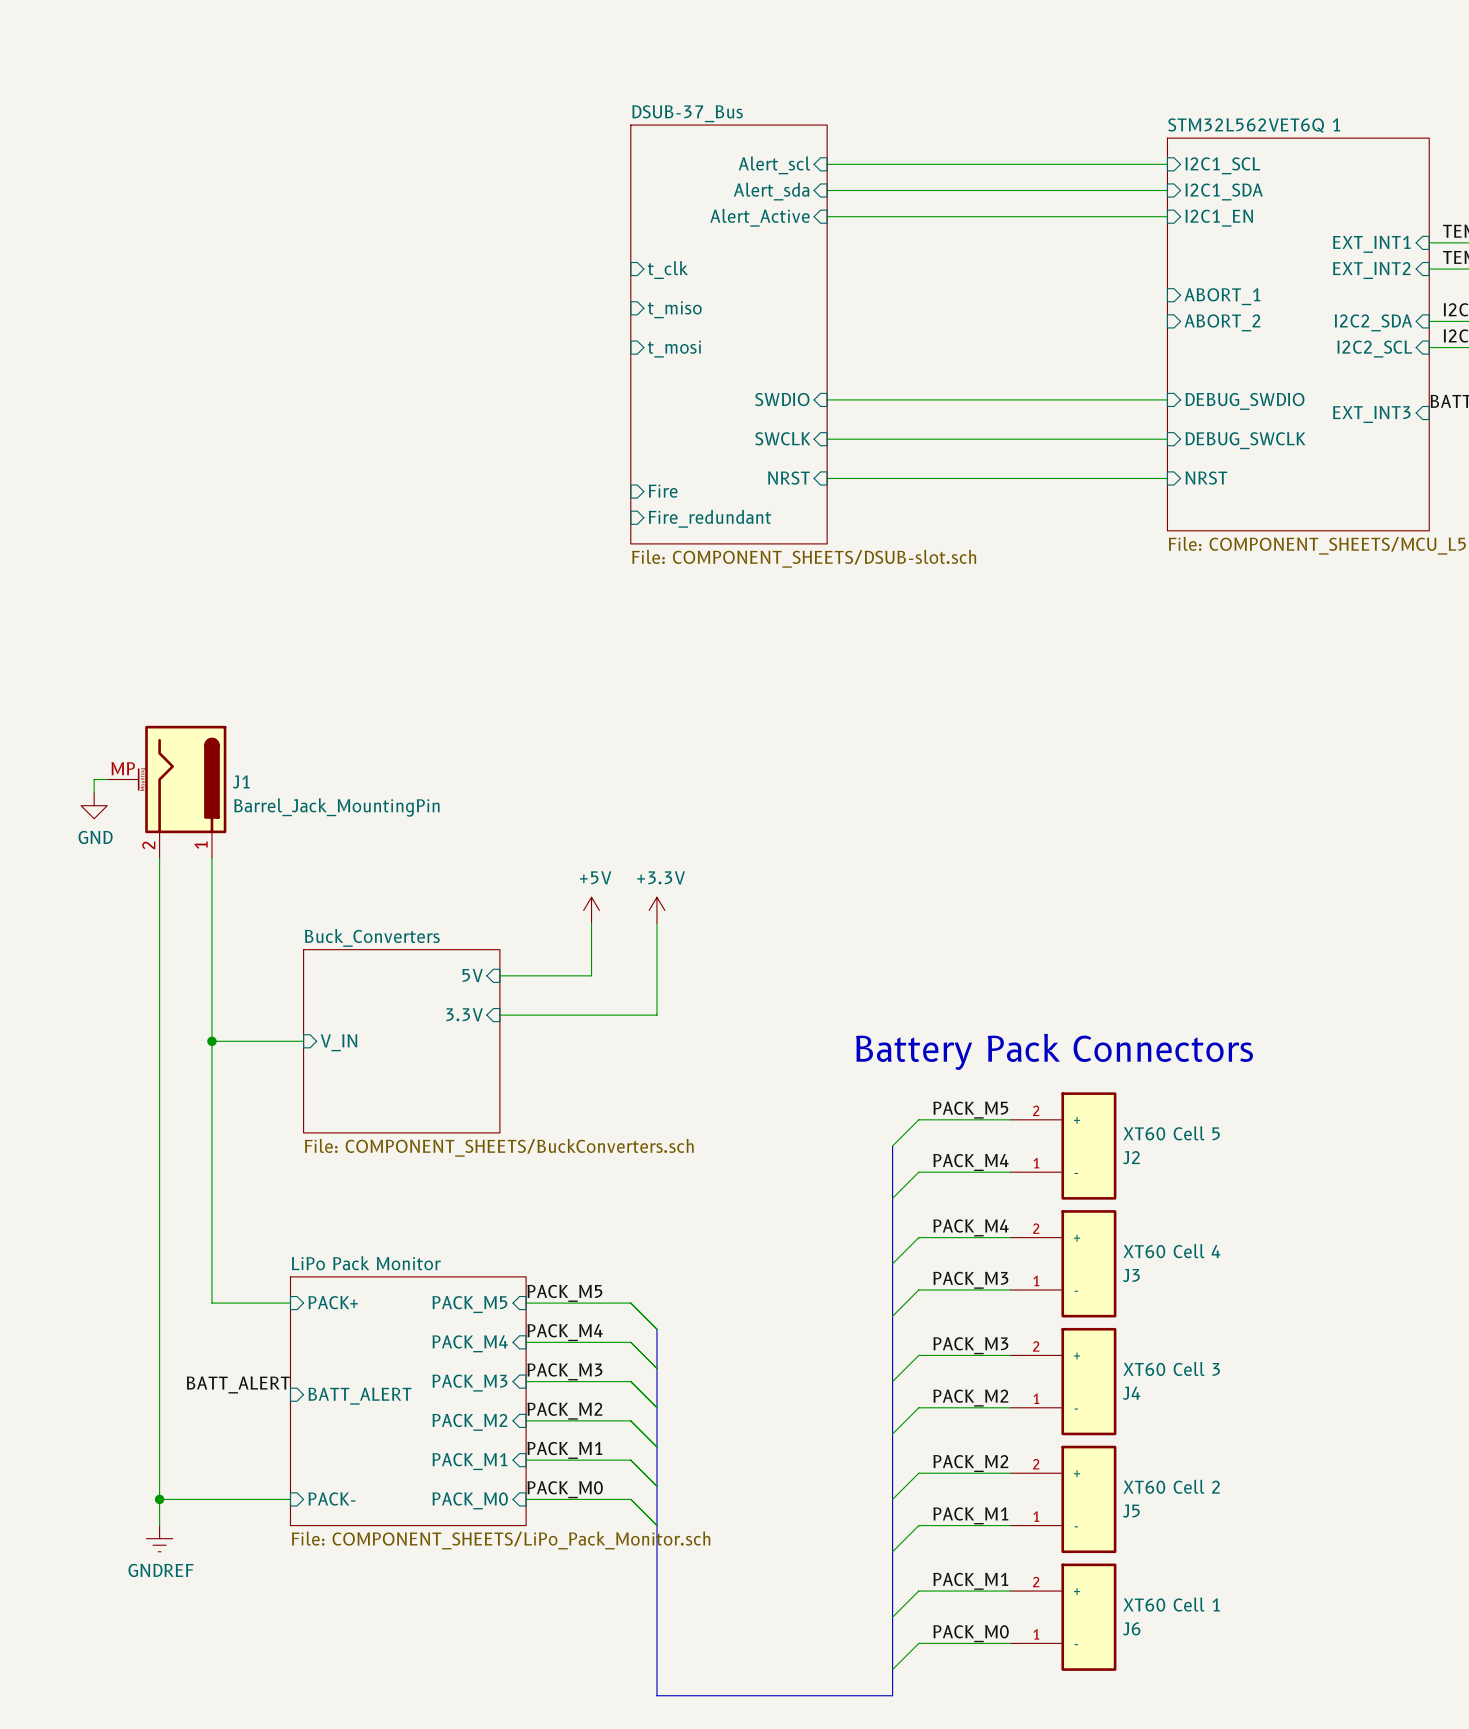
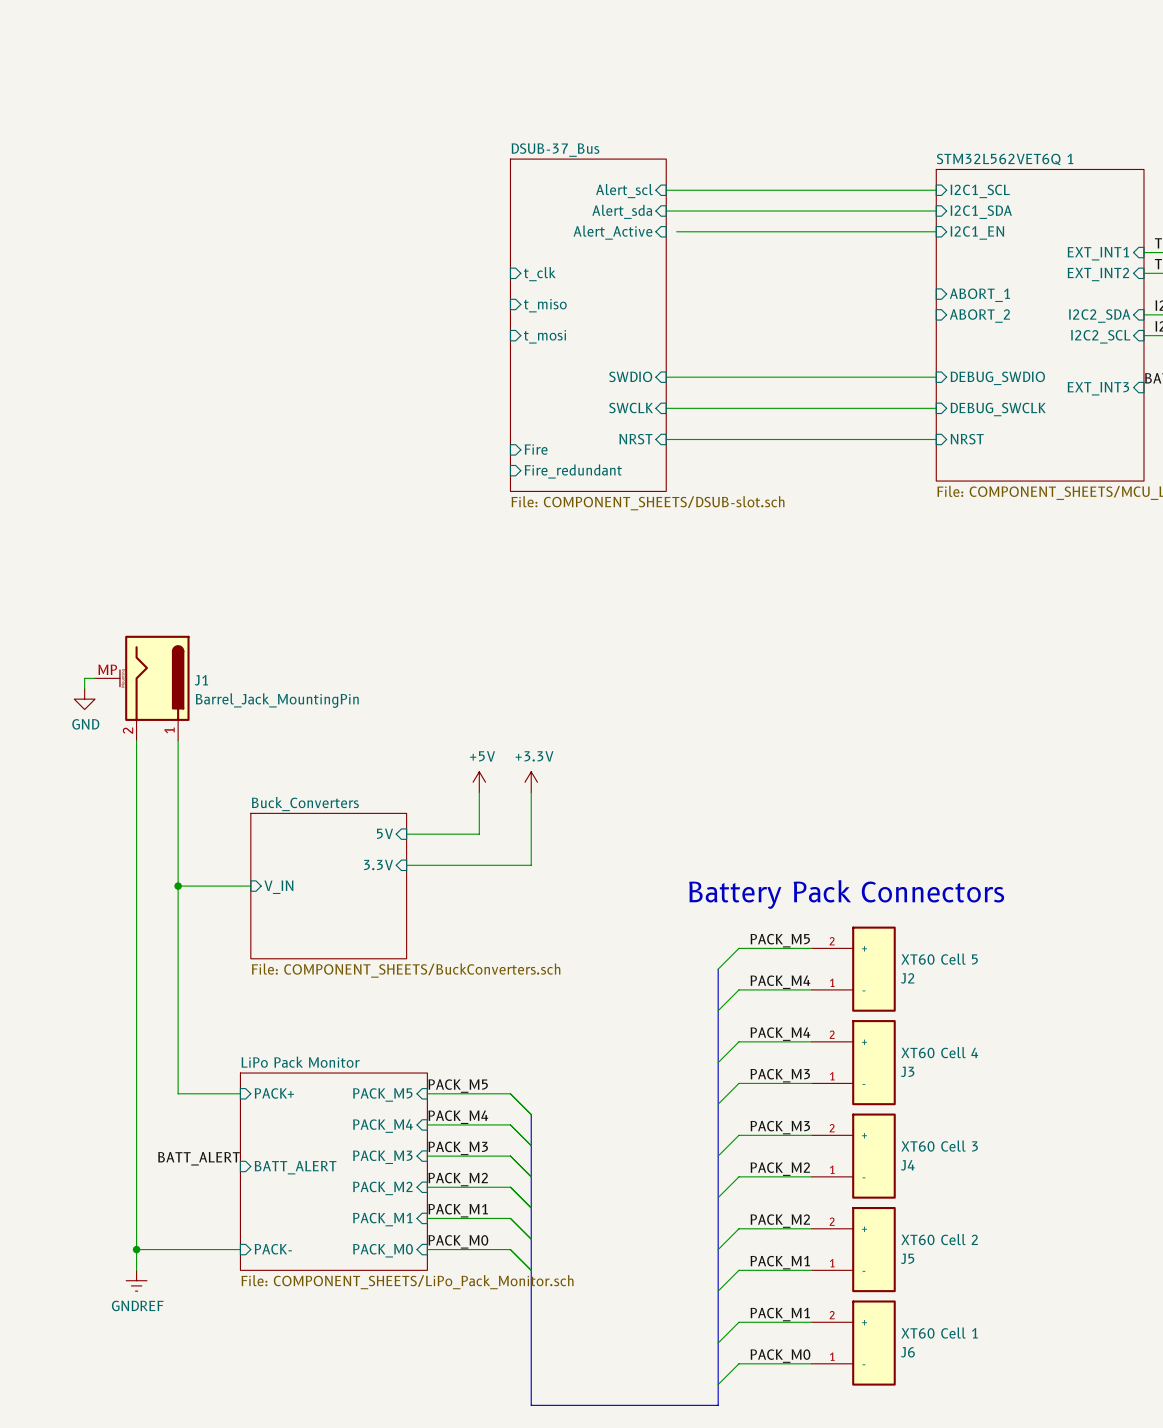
wire: (827, 216) (840, 216) -> none

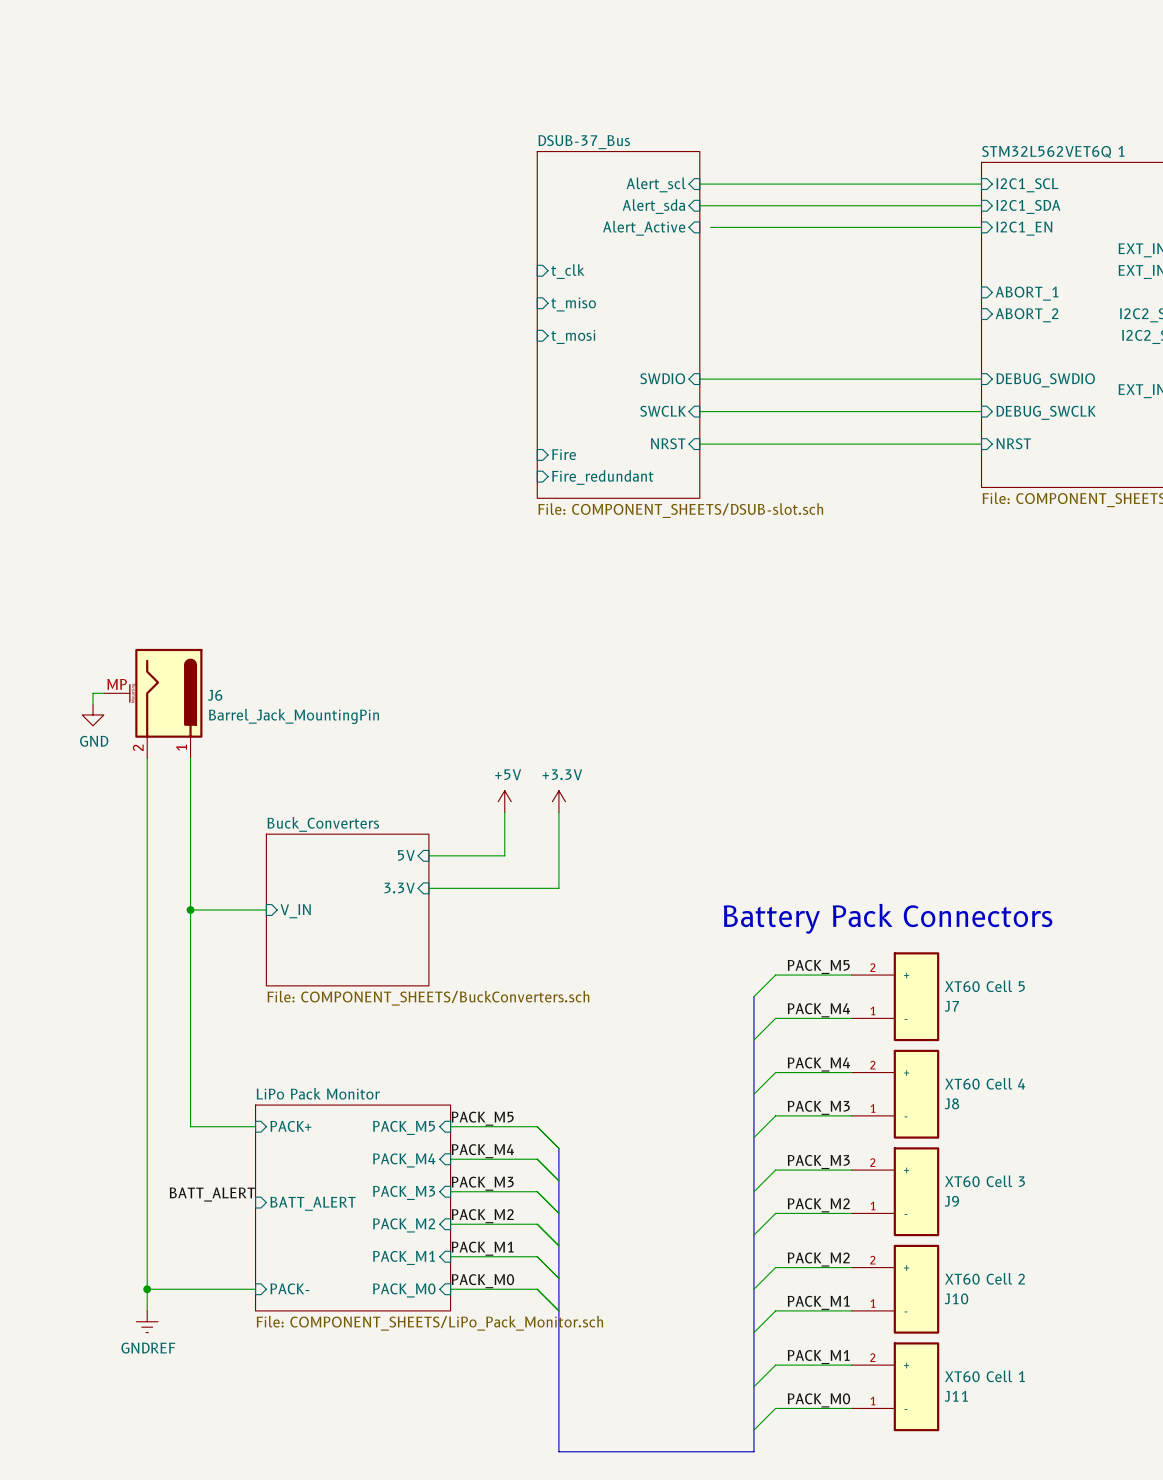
J1 name: J1 (201, 680) -> J6 (215, 695)
J2 name: J2 (907, 978) -> J7 (951, 1006)
J3 name: J3 (907, 1071) -> J8 (951, 1103)
J4 name: J4 (907, 1165) -> J9 (951, 1201)
J5 name: J5 (907, 1258) -> J10 (956, 1298)
J6 name: J6 (907, 1352) -> J11 (956, 1396)

